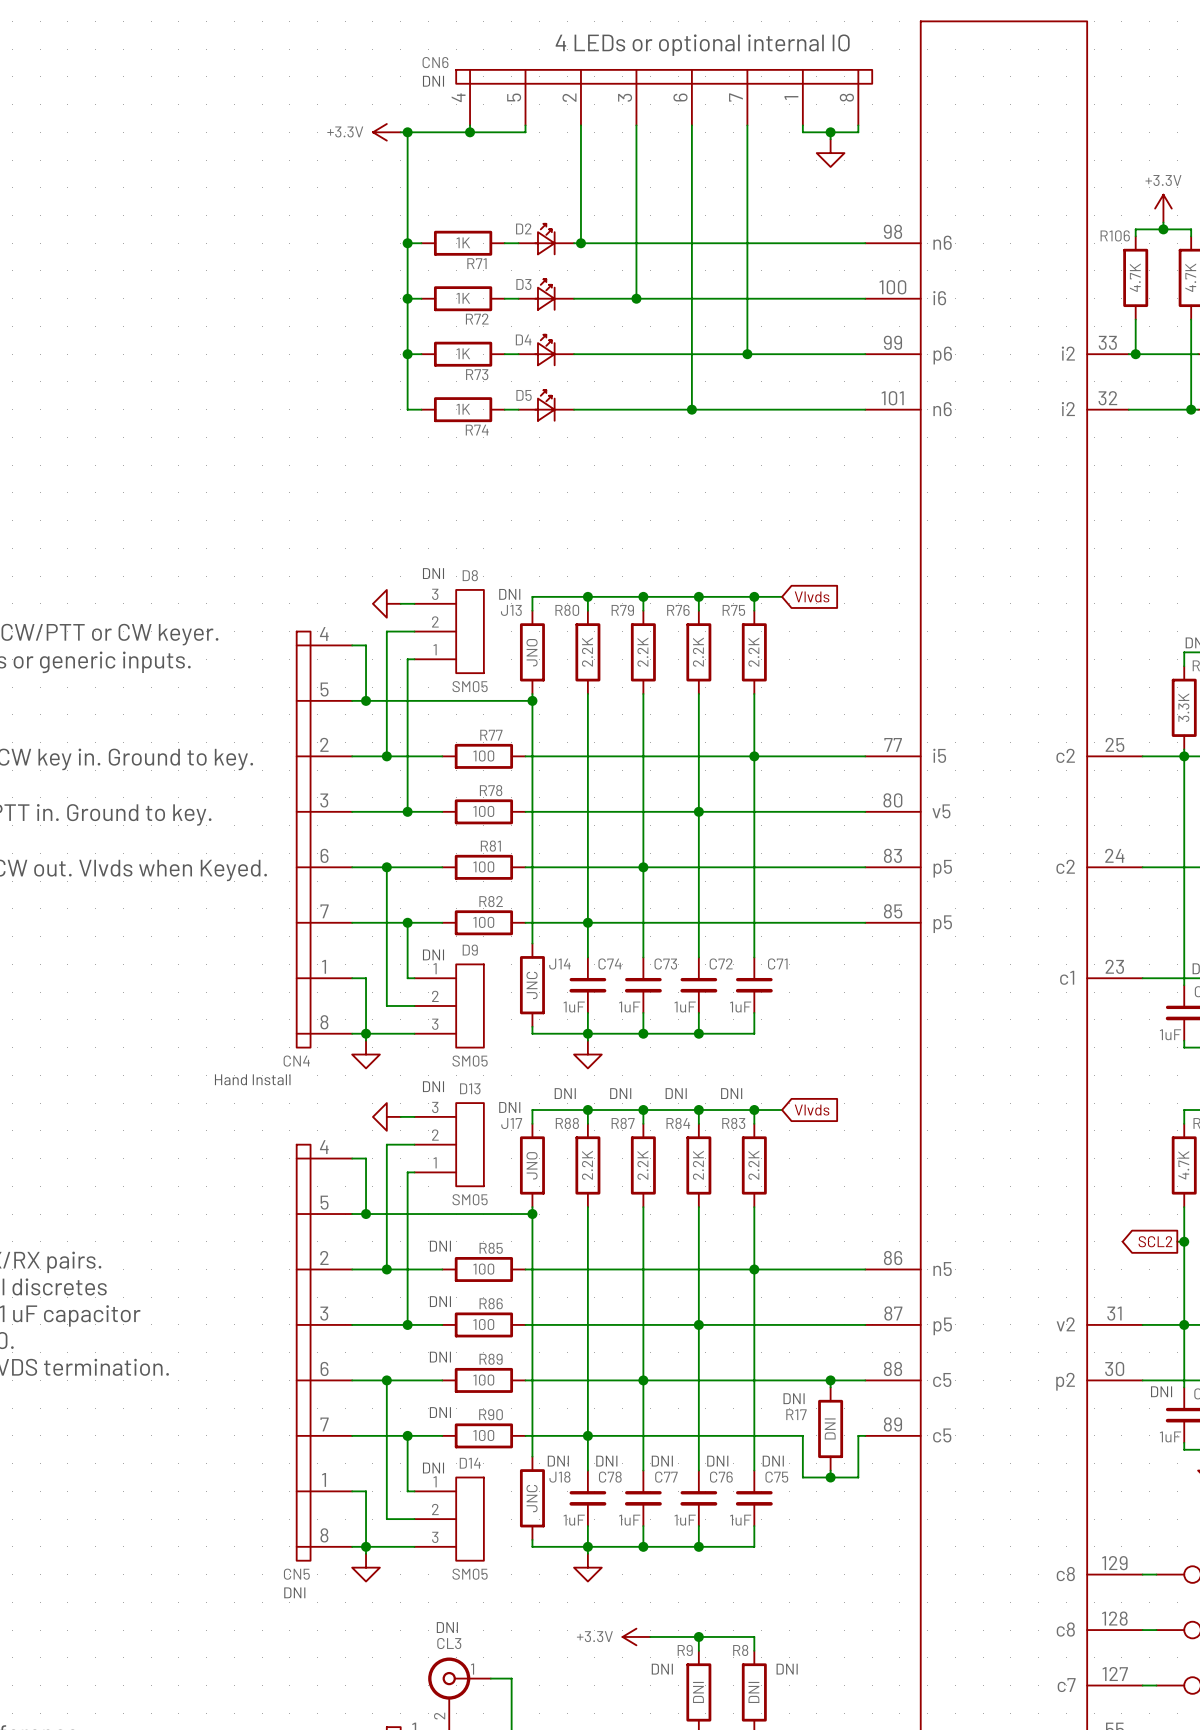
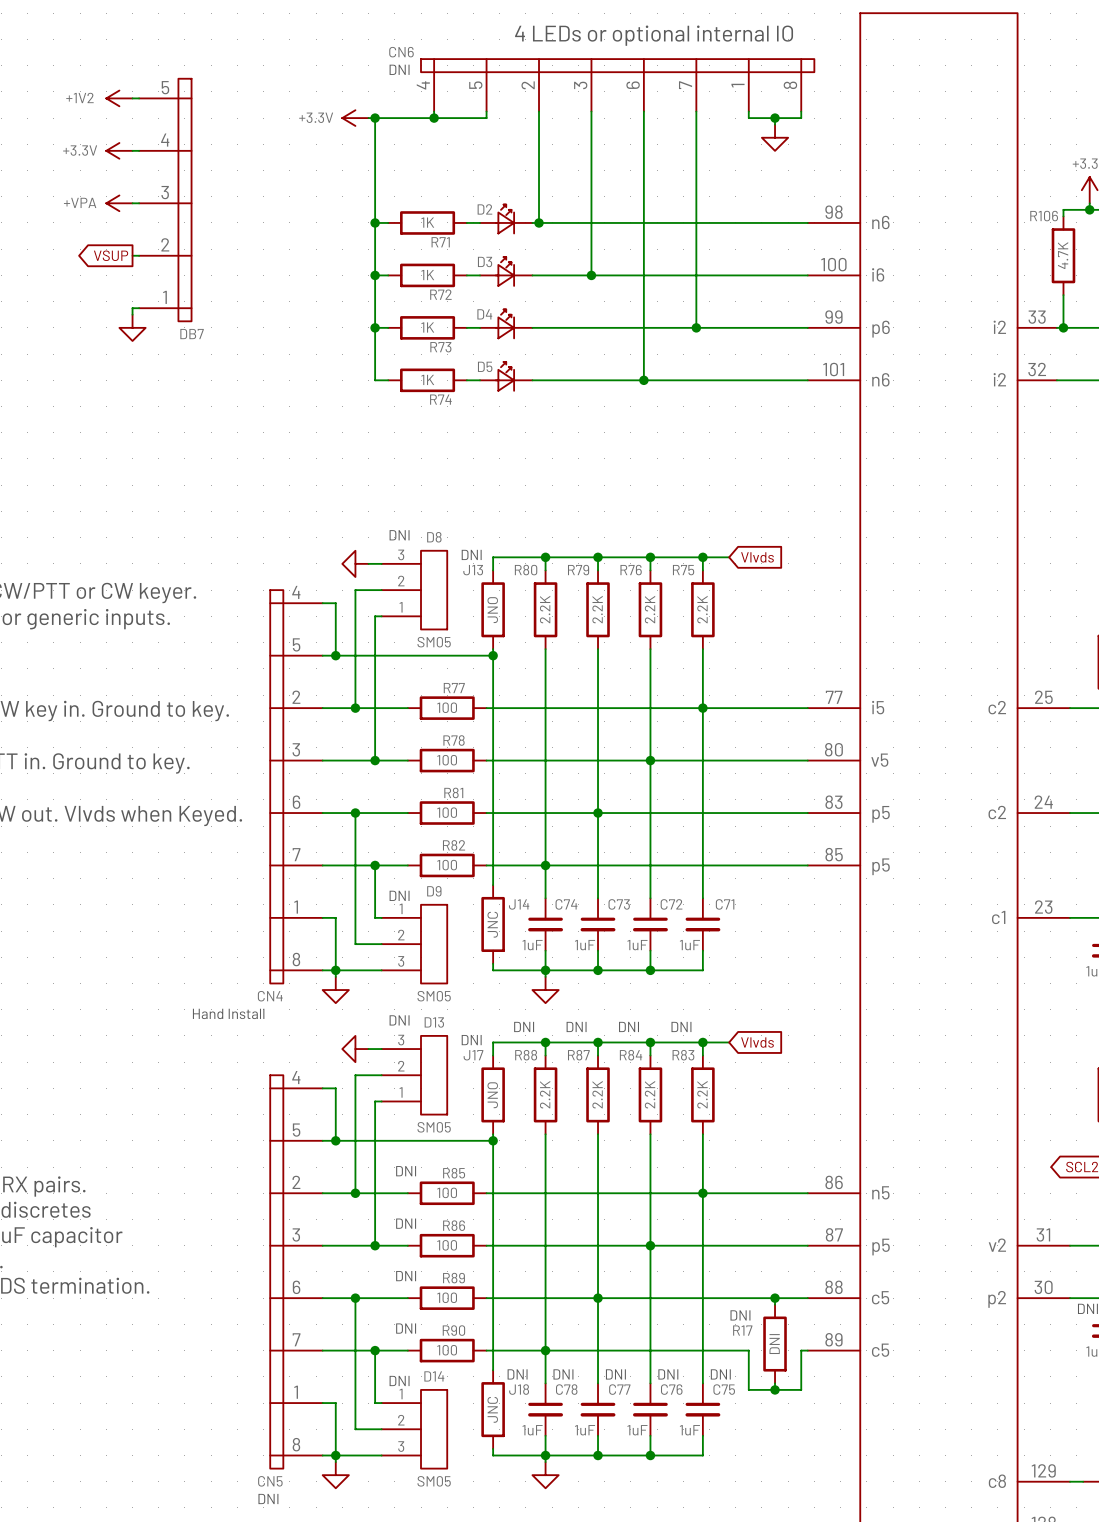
power symbol: none -> +1V2 (119, 98)
wire: none -> (132, 98) (139, 98)
power symbol: none -> +3.3V (119, 150)
wire: none -> (132, 150) (139, 150)
DB7: none -> (165, 200)
power symbol: none -> +VPA (119, 203)
wire: none -> (132, 203) (139, 203)
global label: none -> VSUP (111, 255)
wire: none -> (132, 255) (139, 255)
wire: none -> (139, 308) (132, 308) (132, 314)
power symbol: none -> (132, 327)

